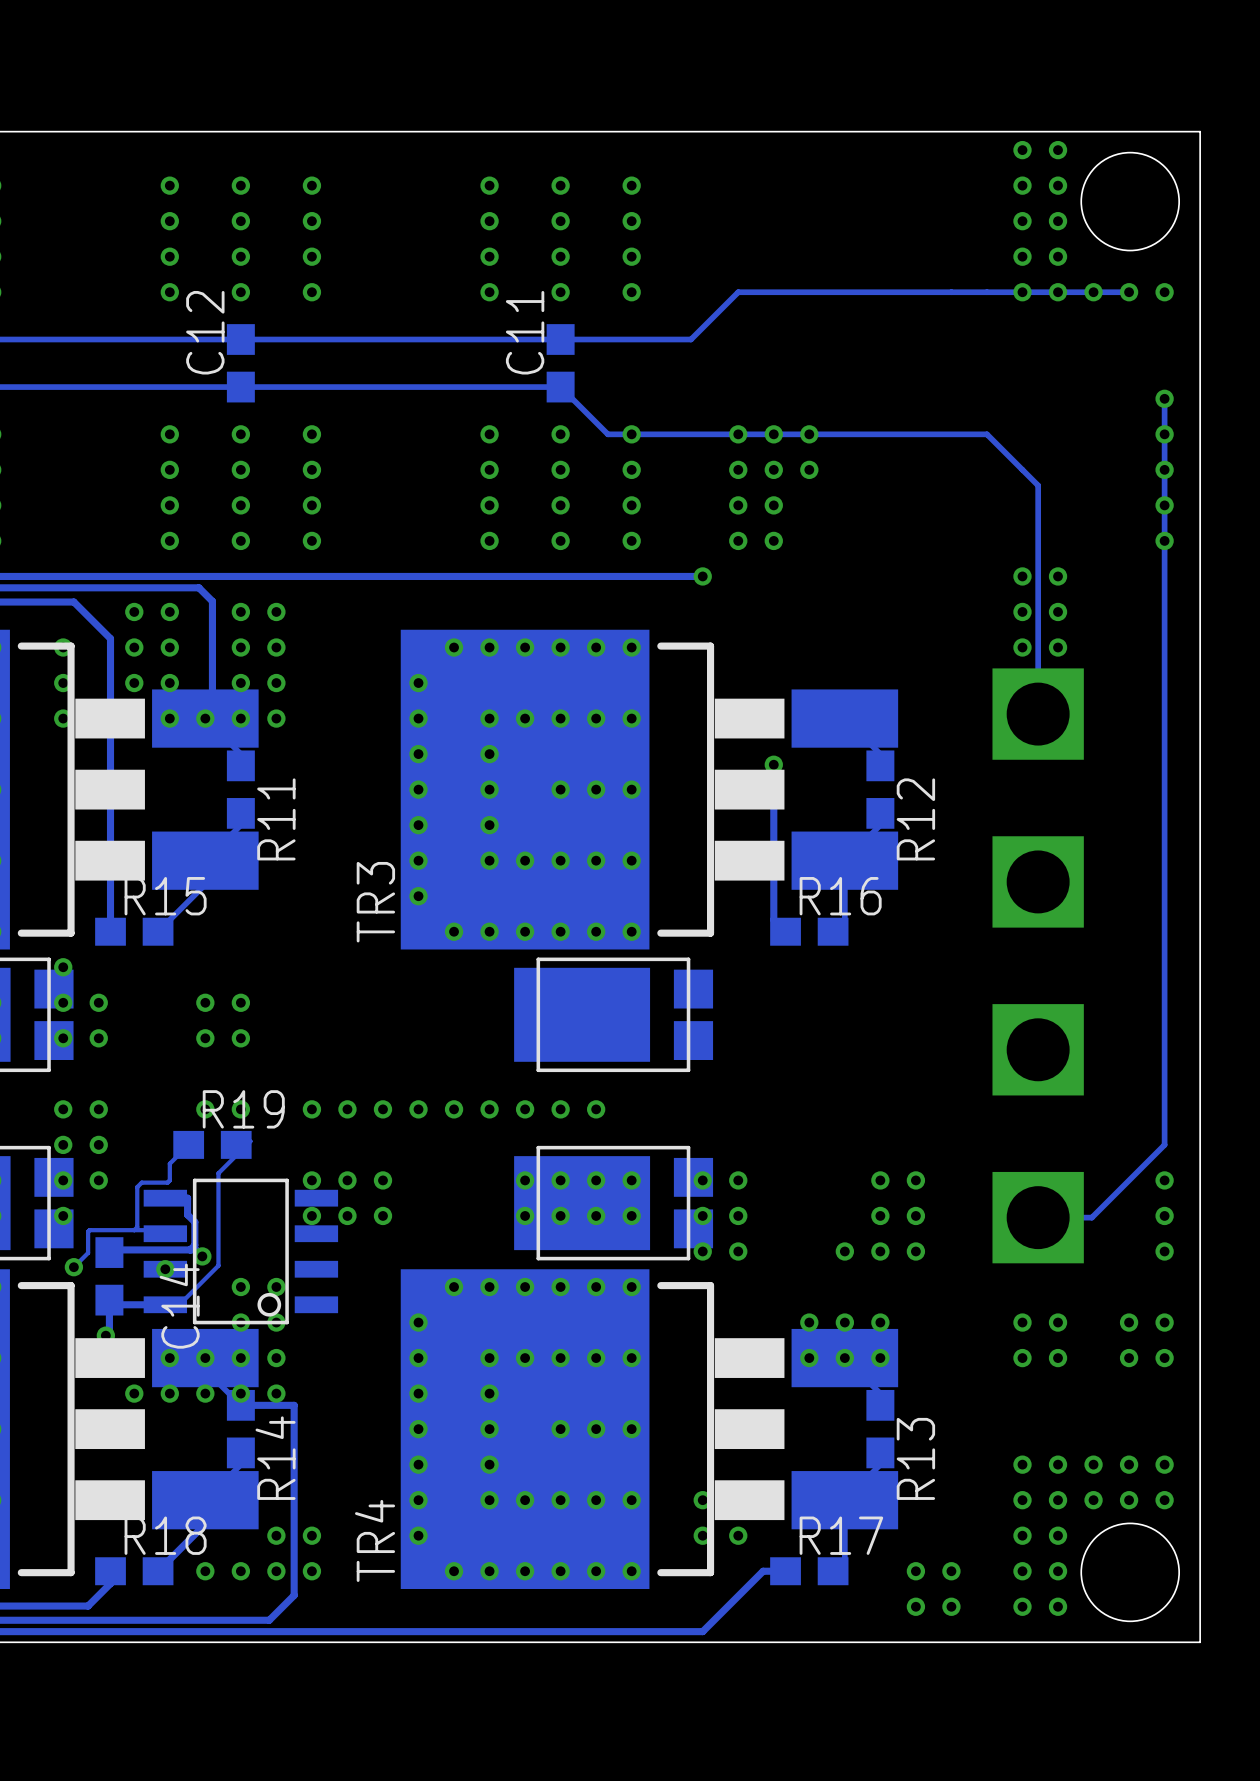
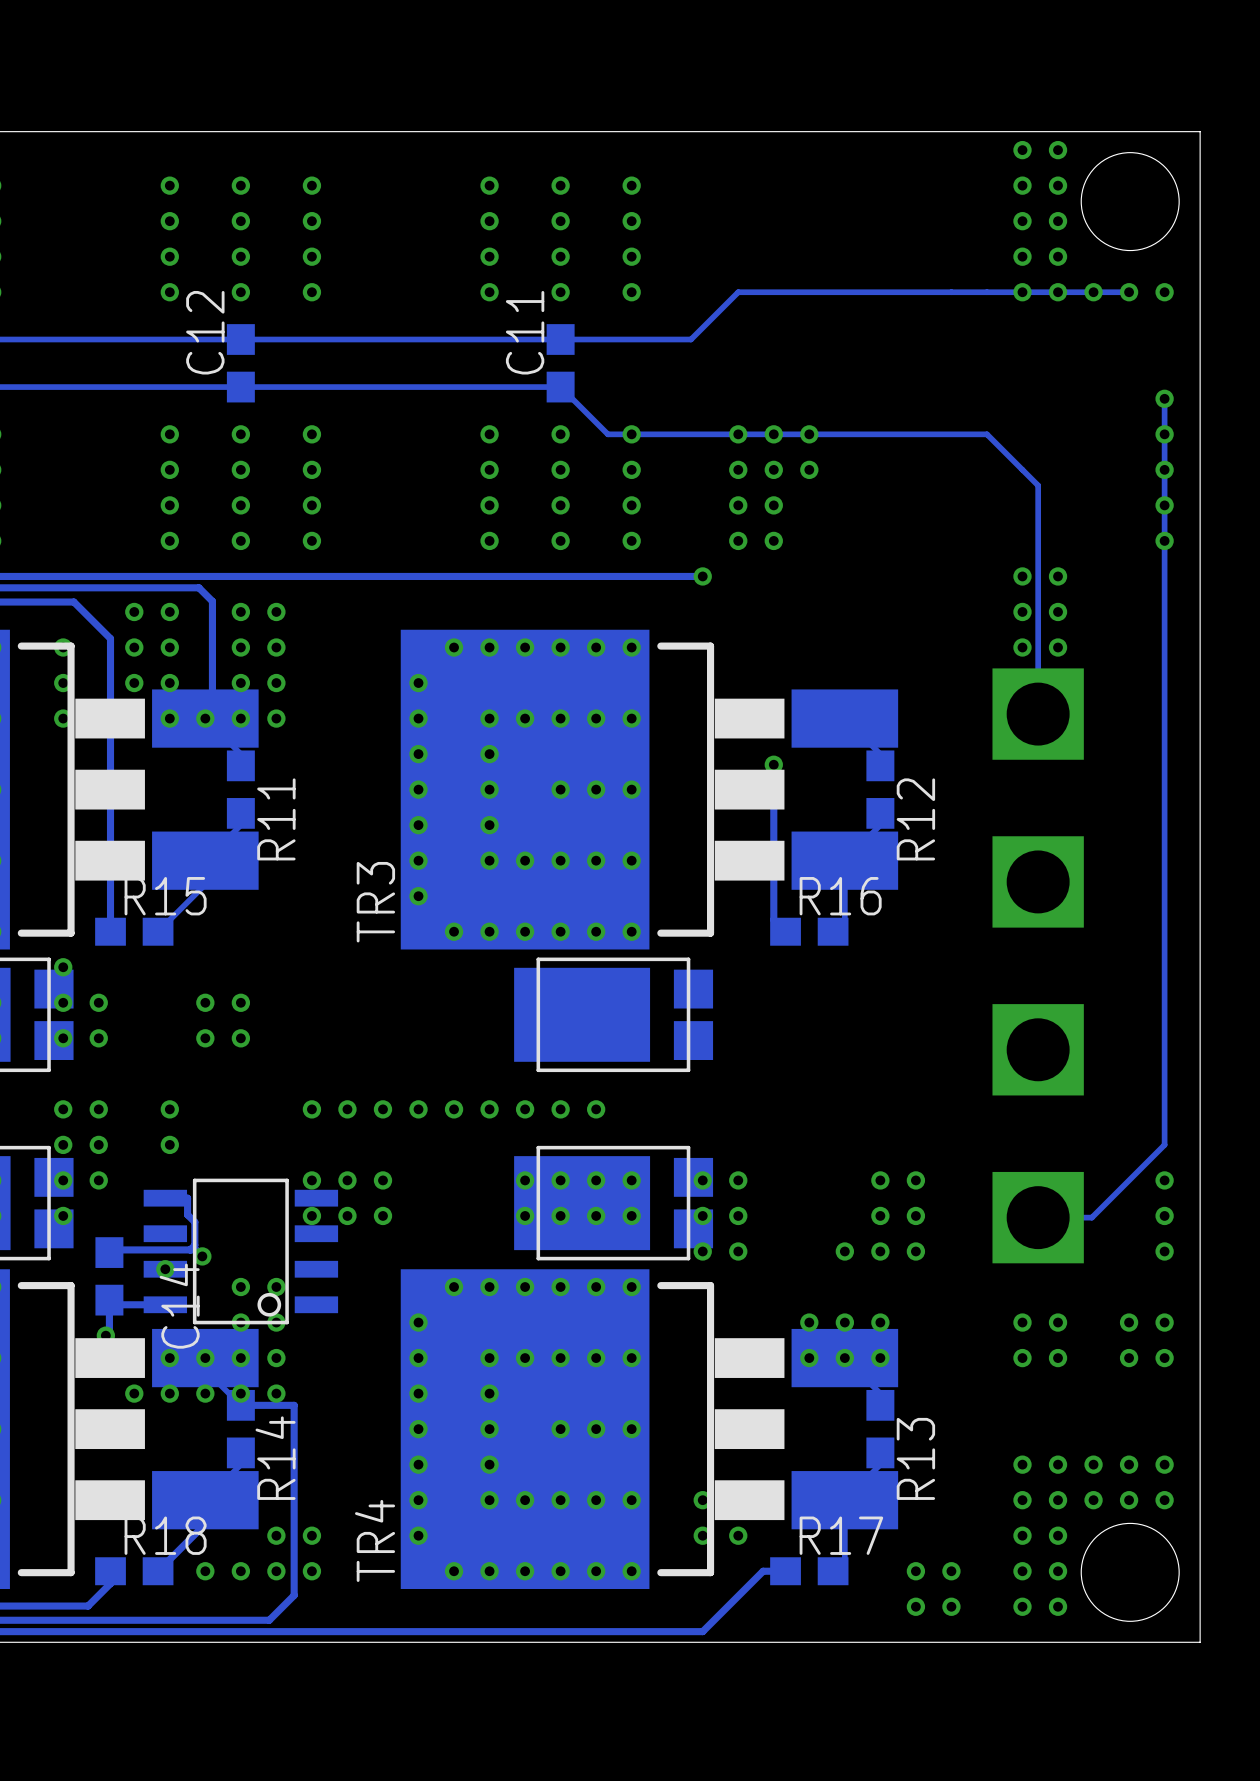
via: none -> (169, 1109)
via: (205, 1109) -> none
via: (240, 1109) -> none
via: none -> (169, 1144)
track: (188, 1144) (169, 1163) (169, 1180) (167, 1182) (141, 1182) (137, 1187) (137, 1227) (134, 1230) -> none
R19: (212, 1144) -> none
track: (236, 1144) (239, 1141) (250, 1141) (218, 1173) (218, 1265) (179, 1304) (165, 1304) -> none
track: (165, 1233) (161, 1230) (89, 1230) (88, 1252) (73, 1267) -> none
via: (73, 1267) -> none

